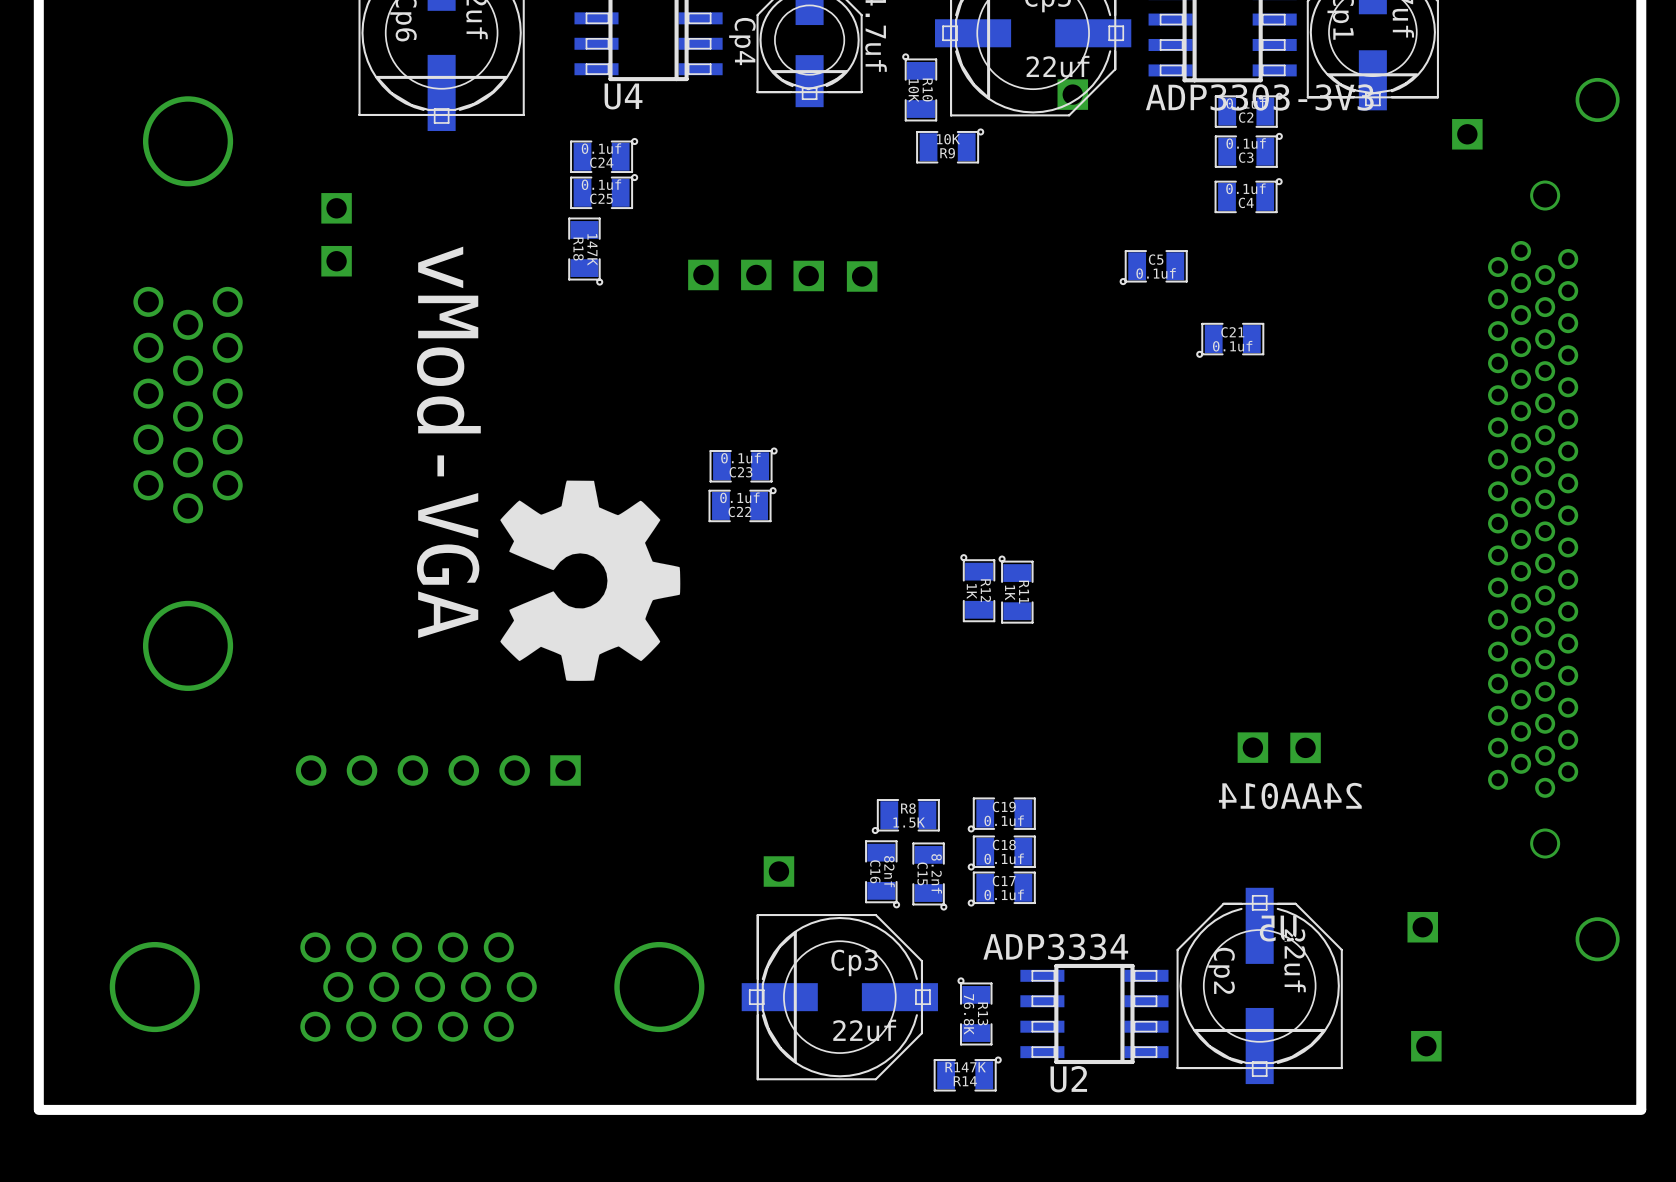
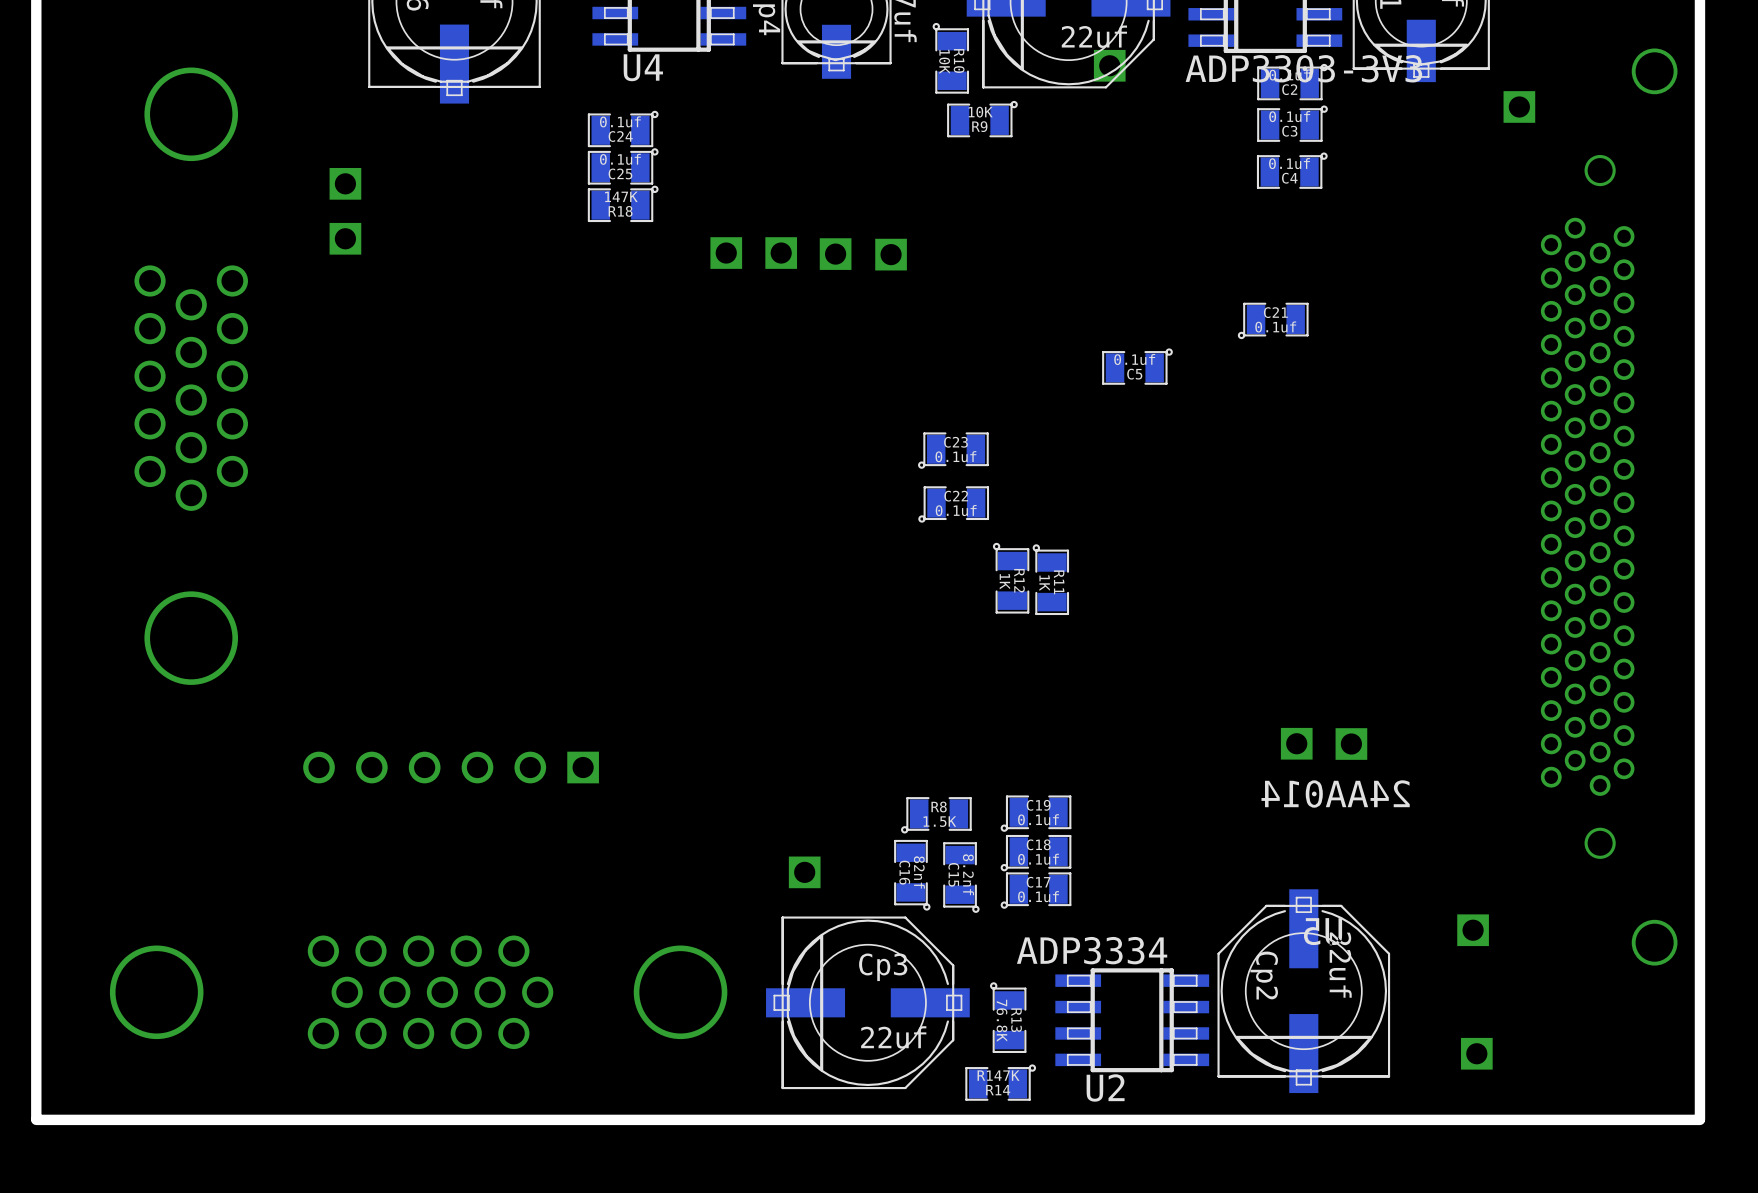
R18 rotation: 0° (585, 251) -> 90° counterclockwise (623, 203)
C5 rotation: 0° (1153, 267) -> 180° (1137, 366)
C5 position: (1153, 267) -> (1137, 366)
text: vMod-VGA (448, 442) -> none
C23 rotation: 0° (743, 464) -> 180° (953, 450)
C23 position: (743, 464) -> (953, 450)
drawing: [500, 480, 681, 681] -> none
C22 rotation: 0° (742, 504) -> 180° (953, 504)
C22 position: (742, 504) -> (953, 504)

